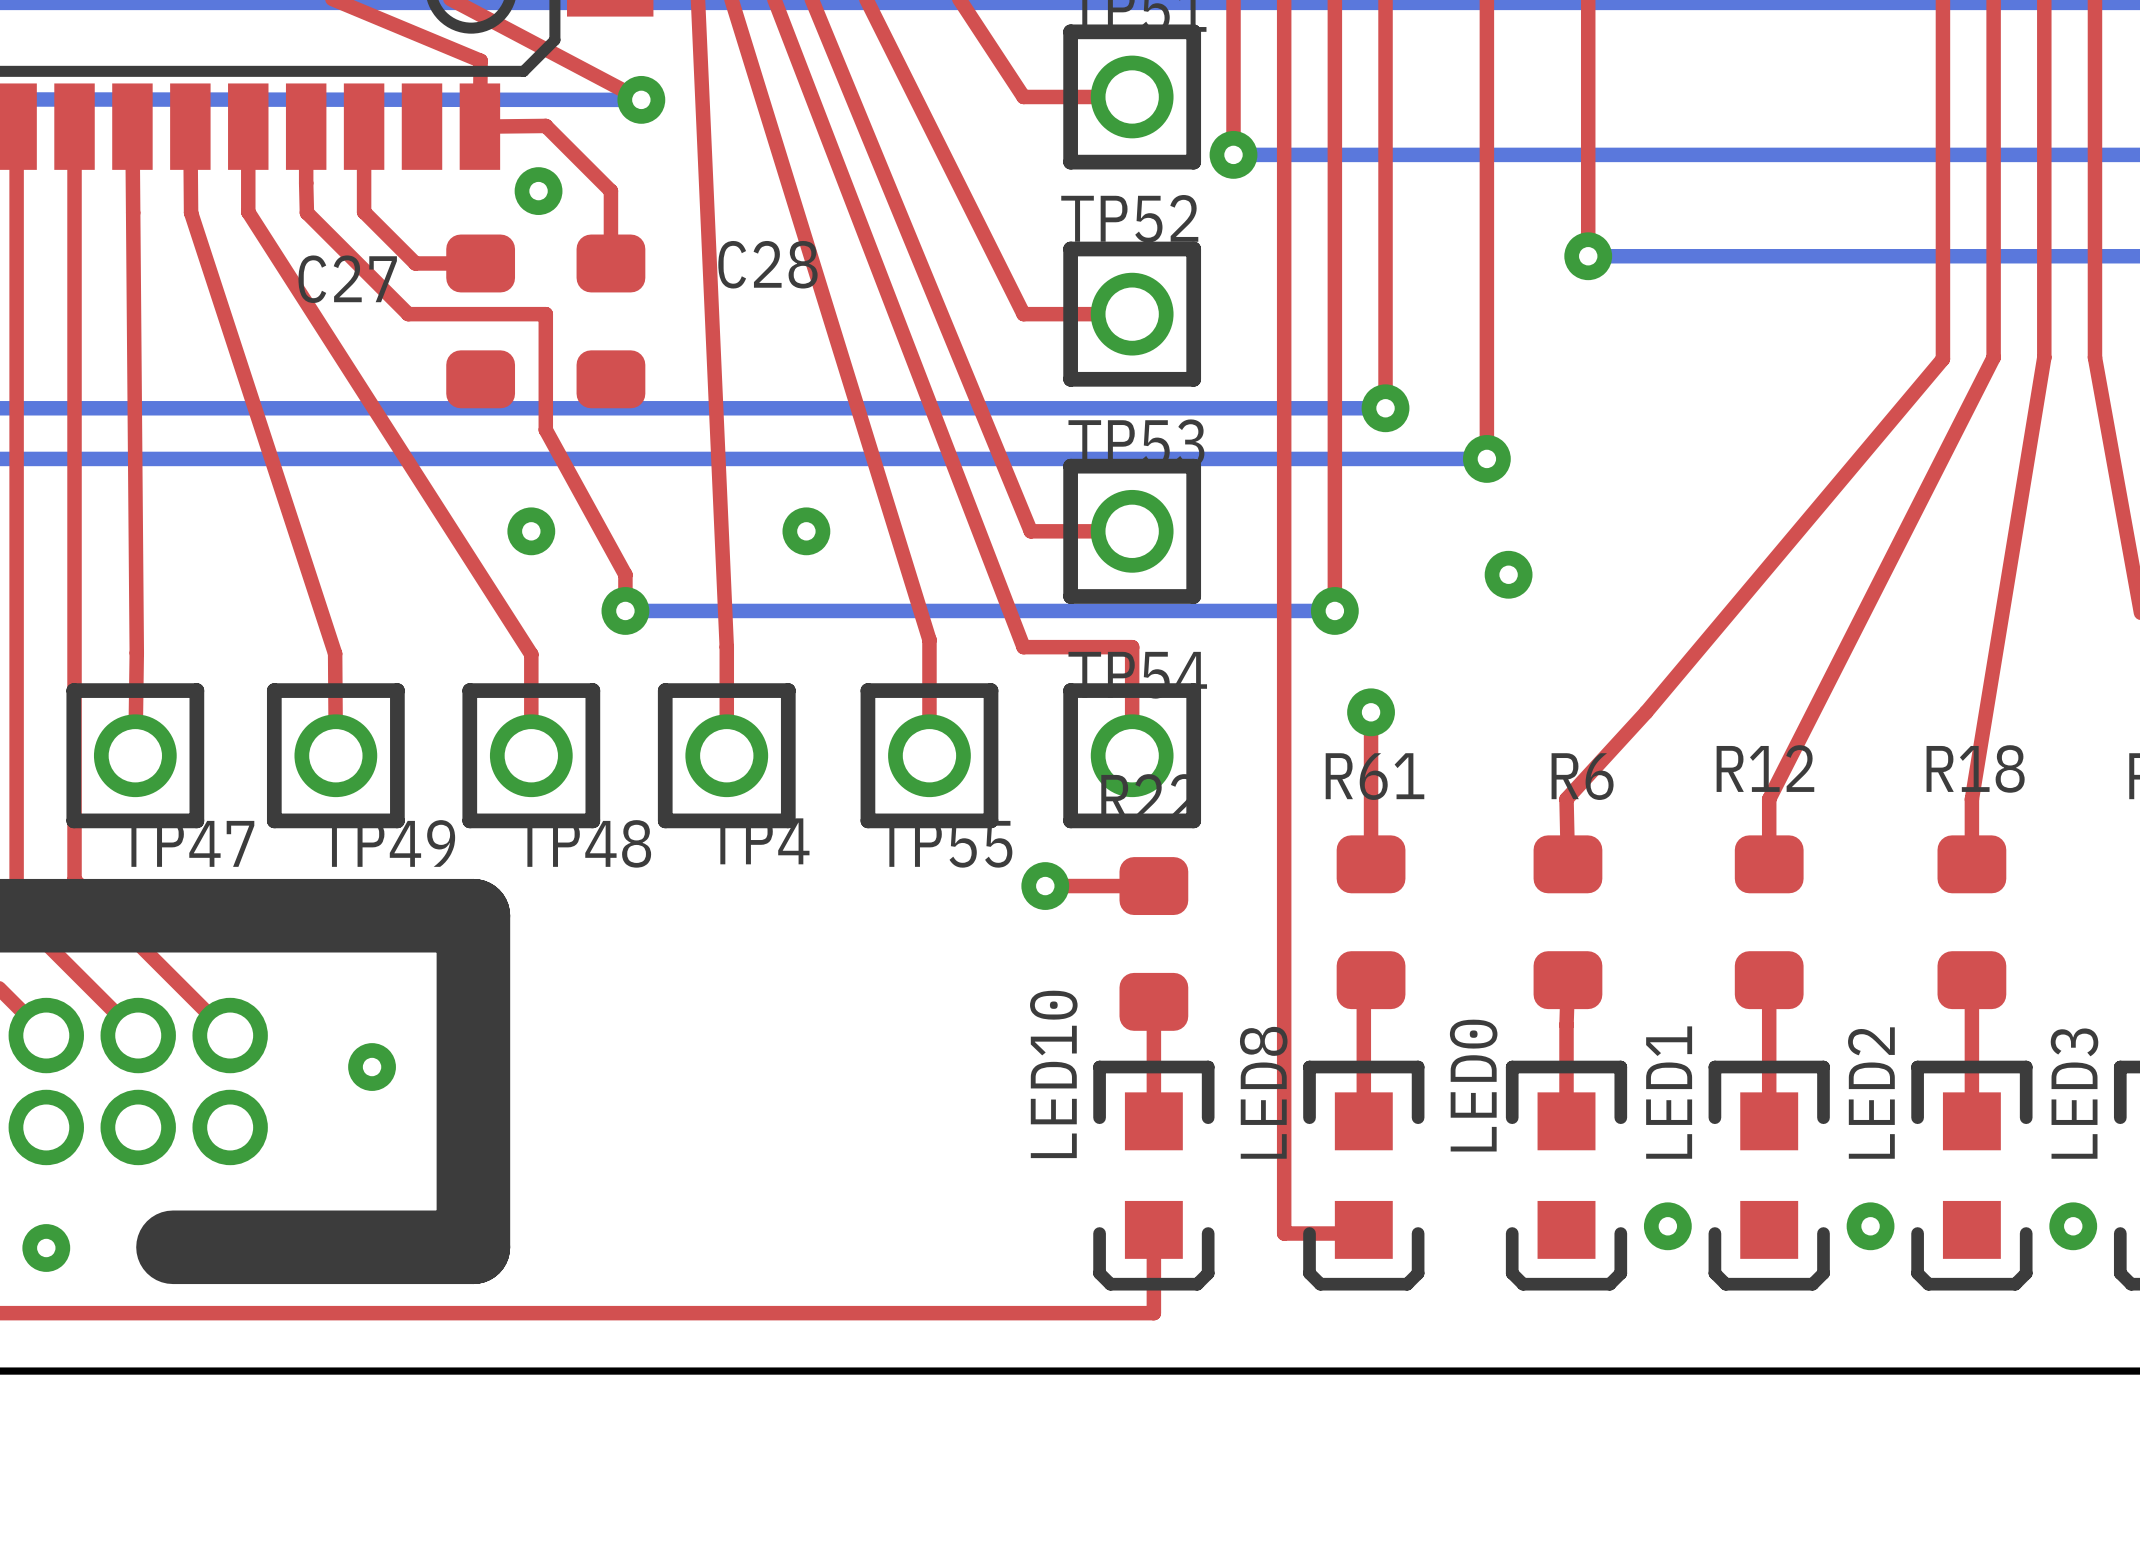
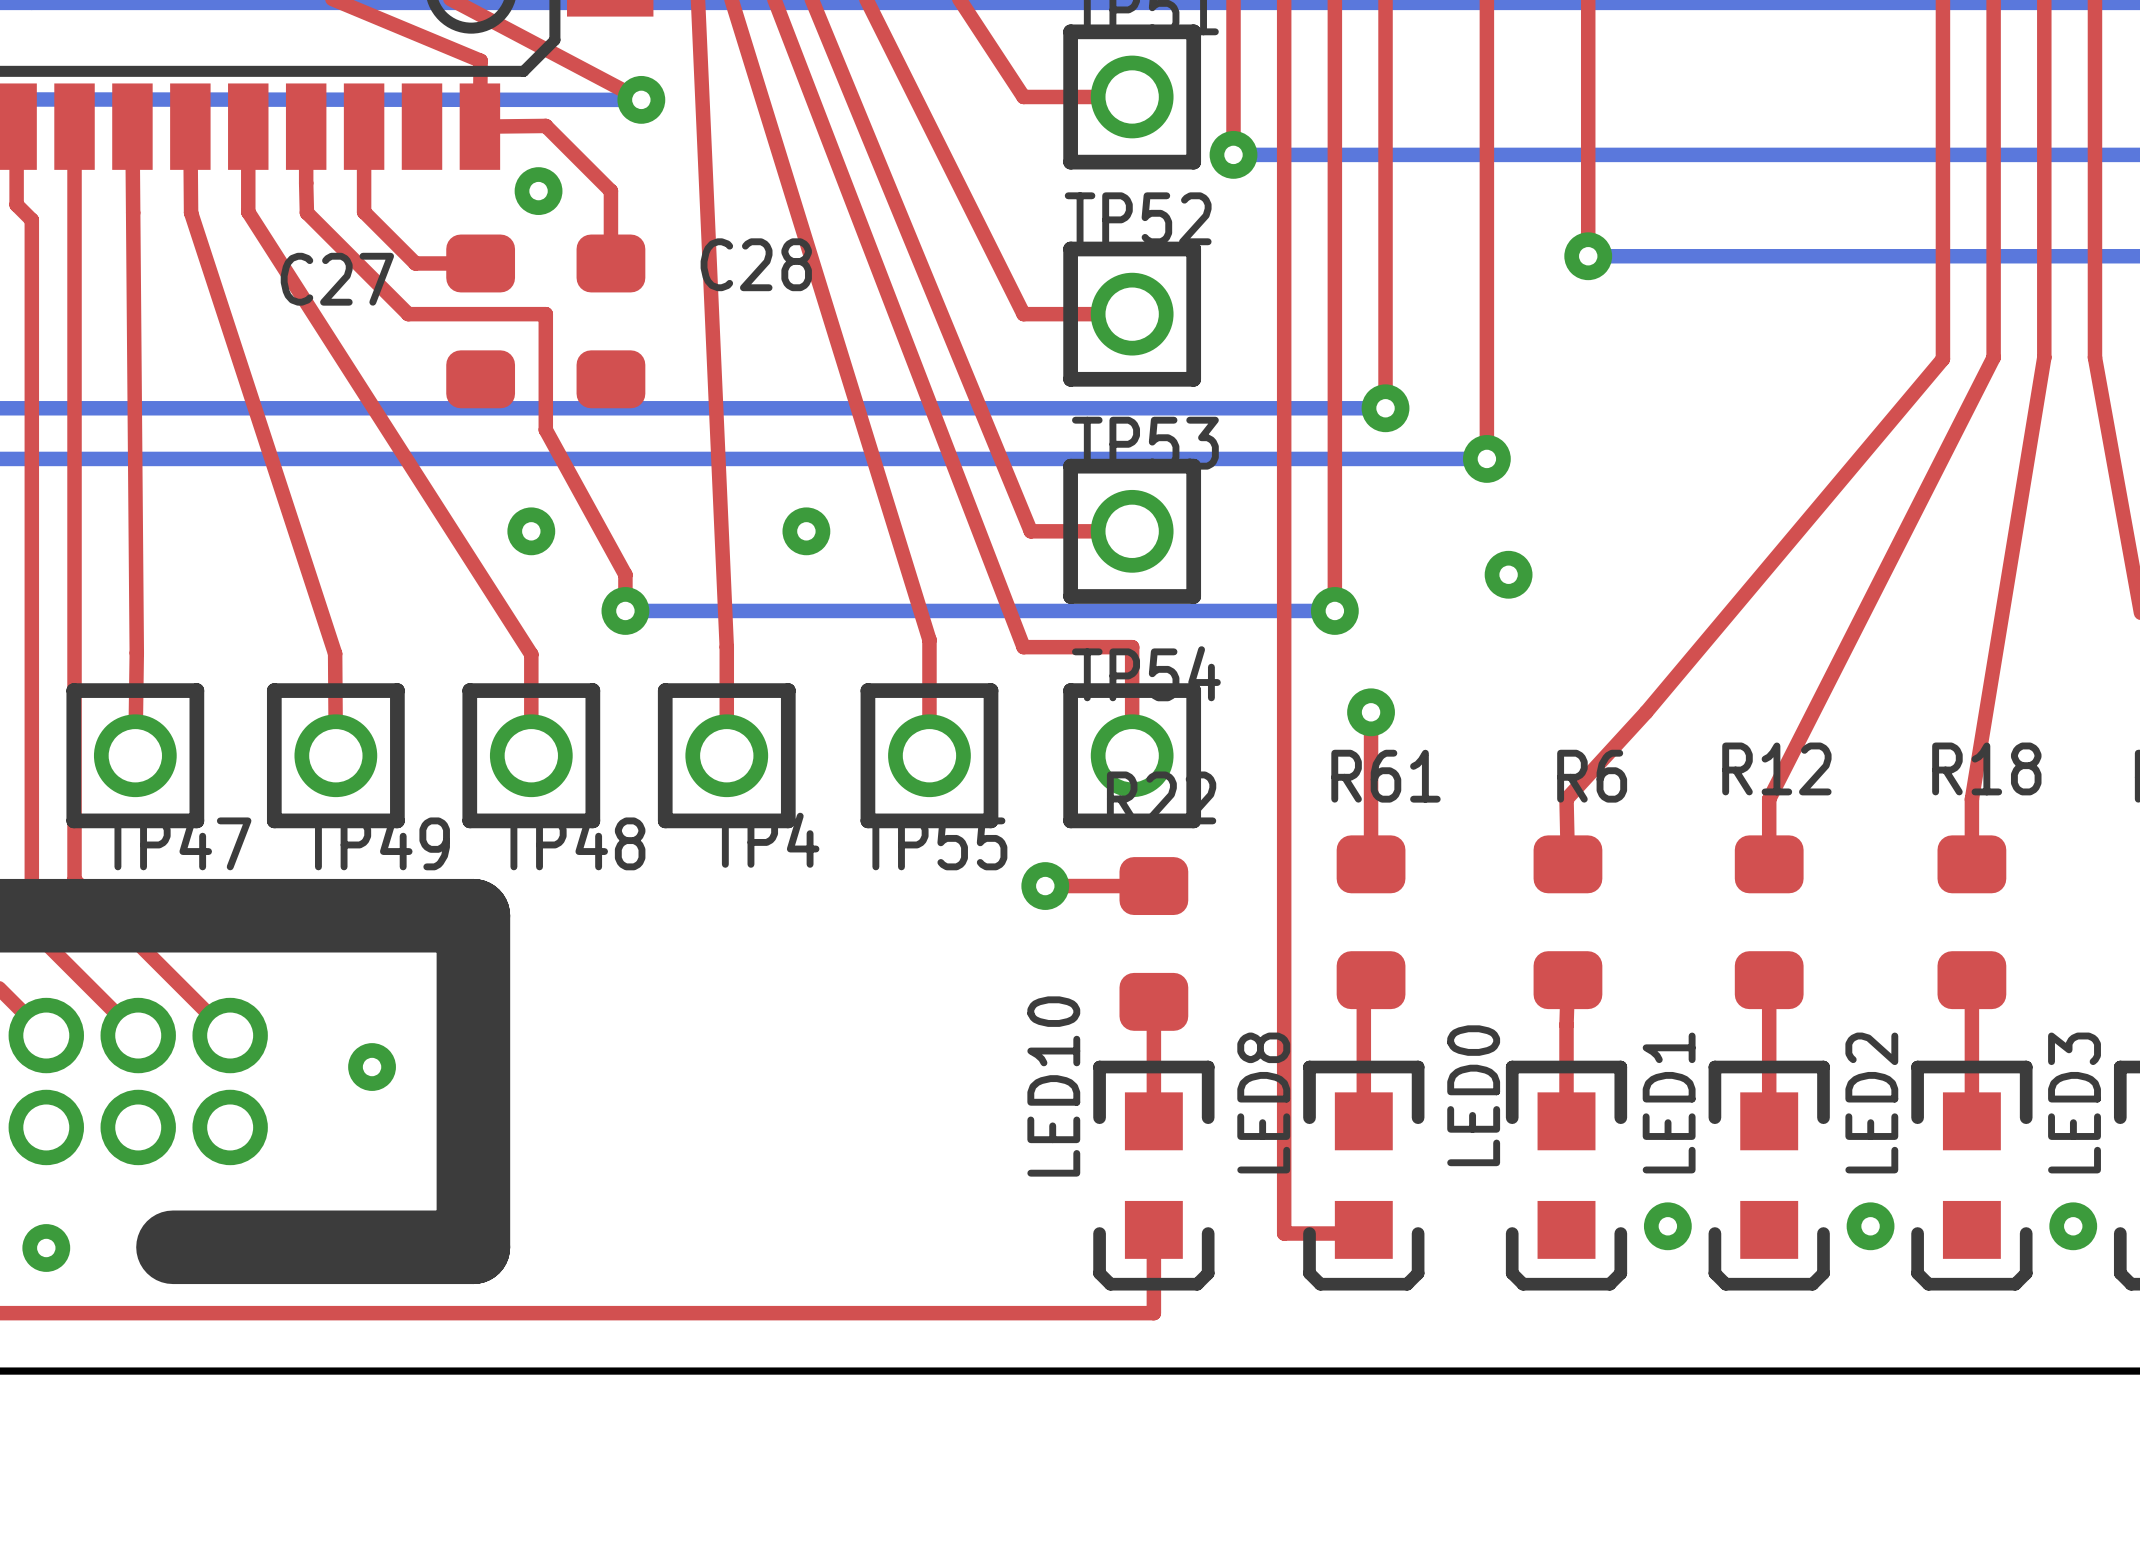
top track: (16, 204) (16, 913) (31, 929) -> (16, 204) (31, 220) (31, 929)

